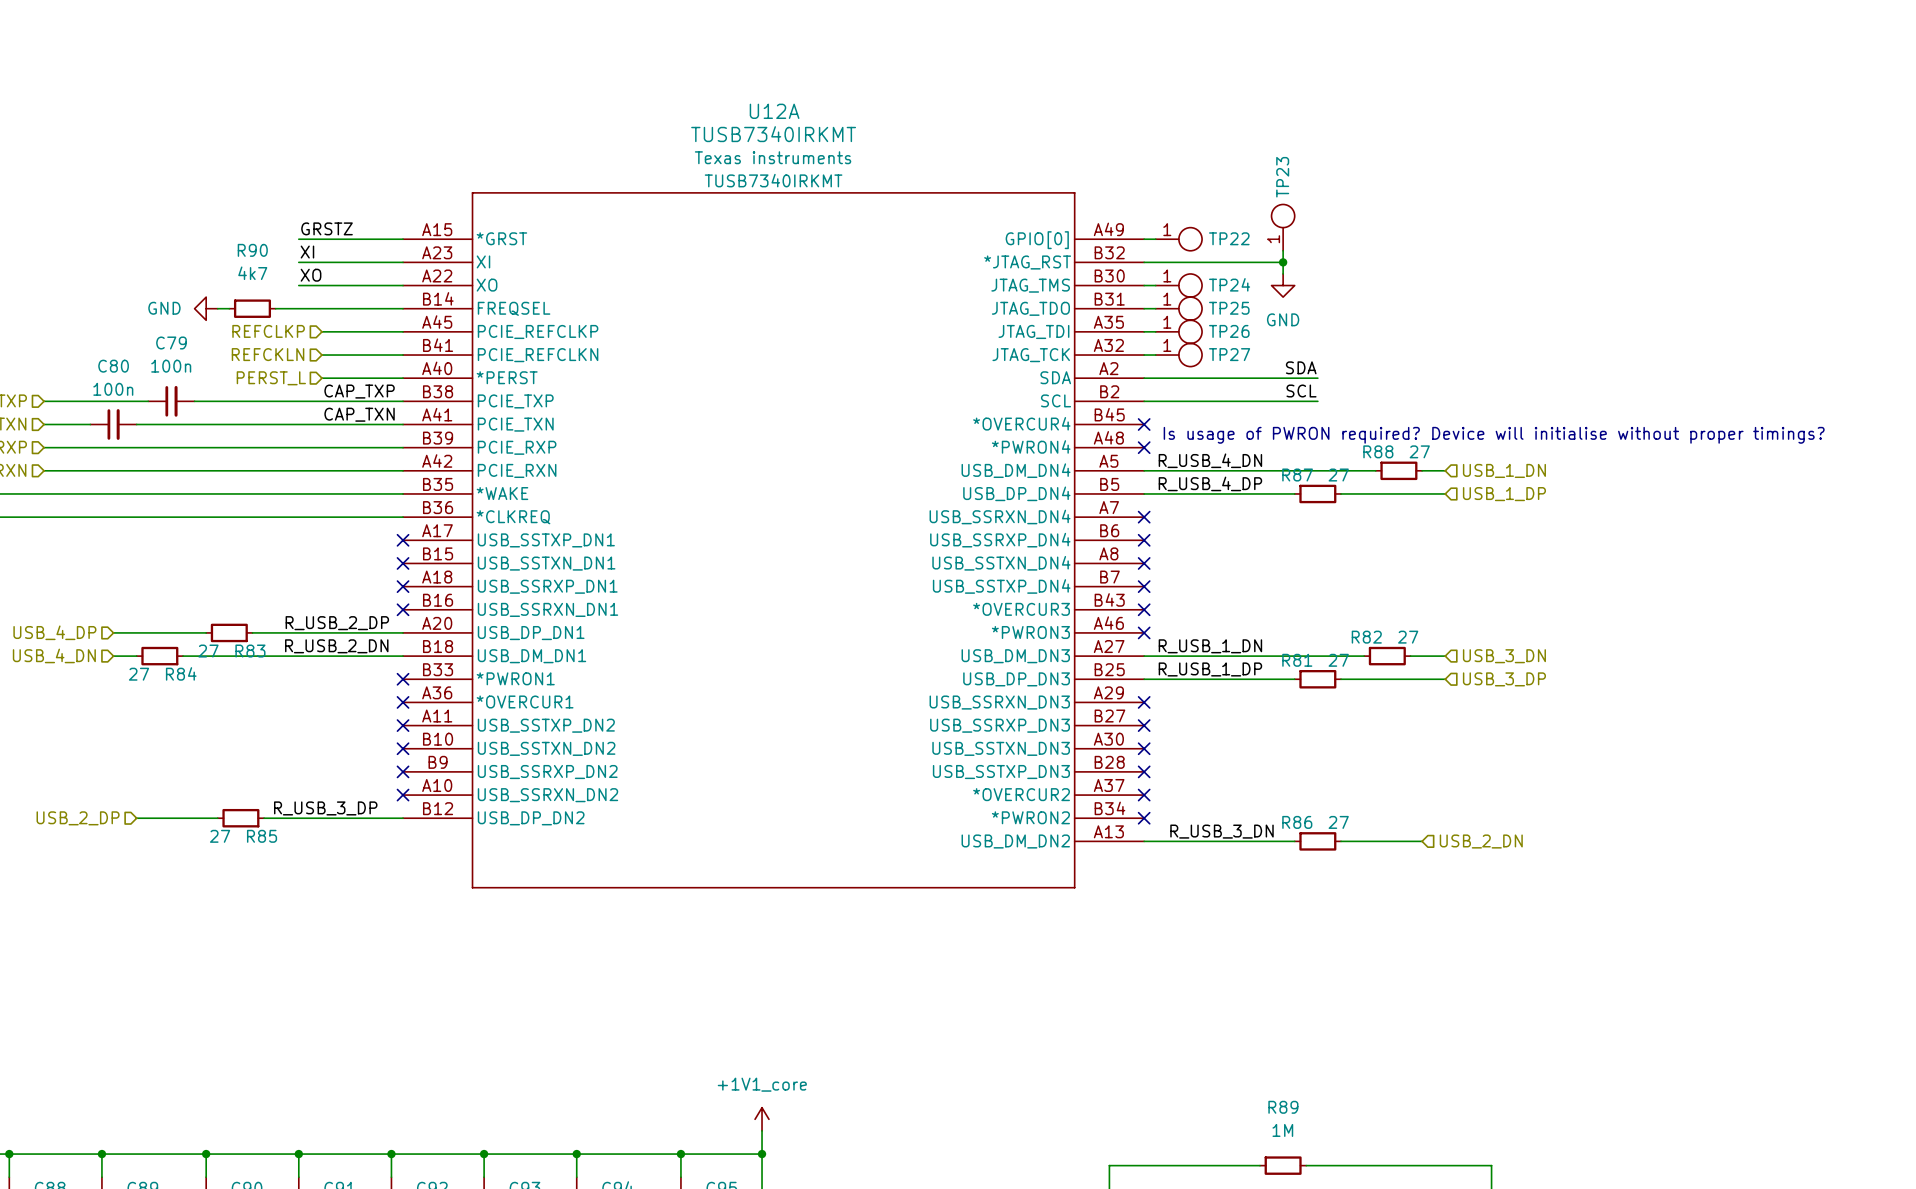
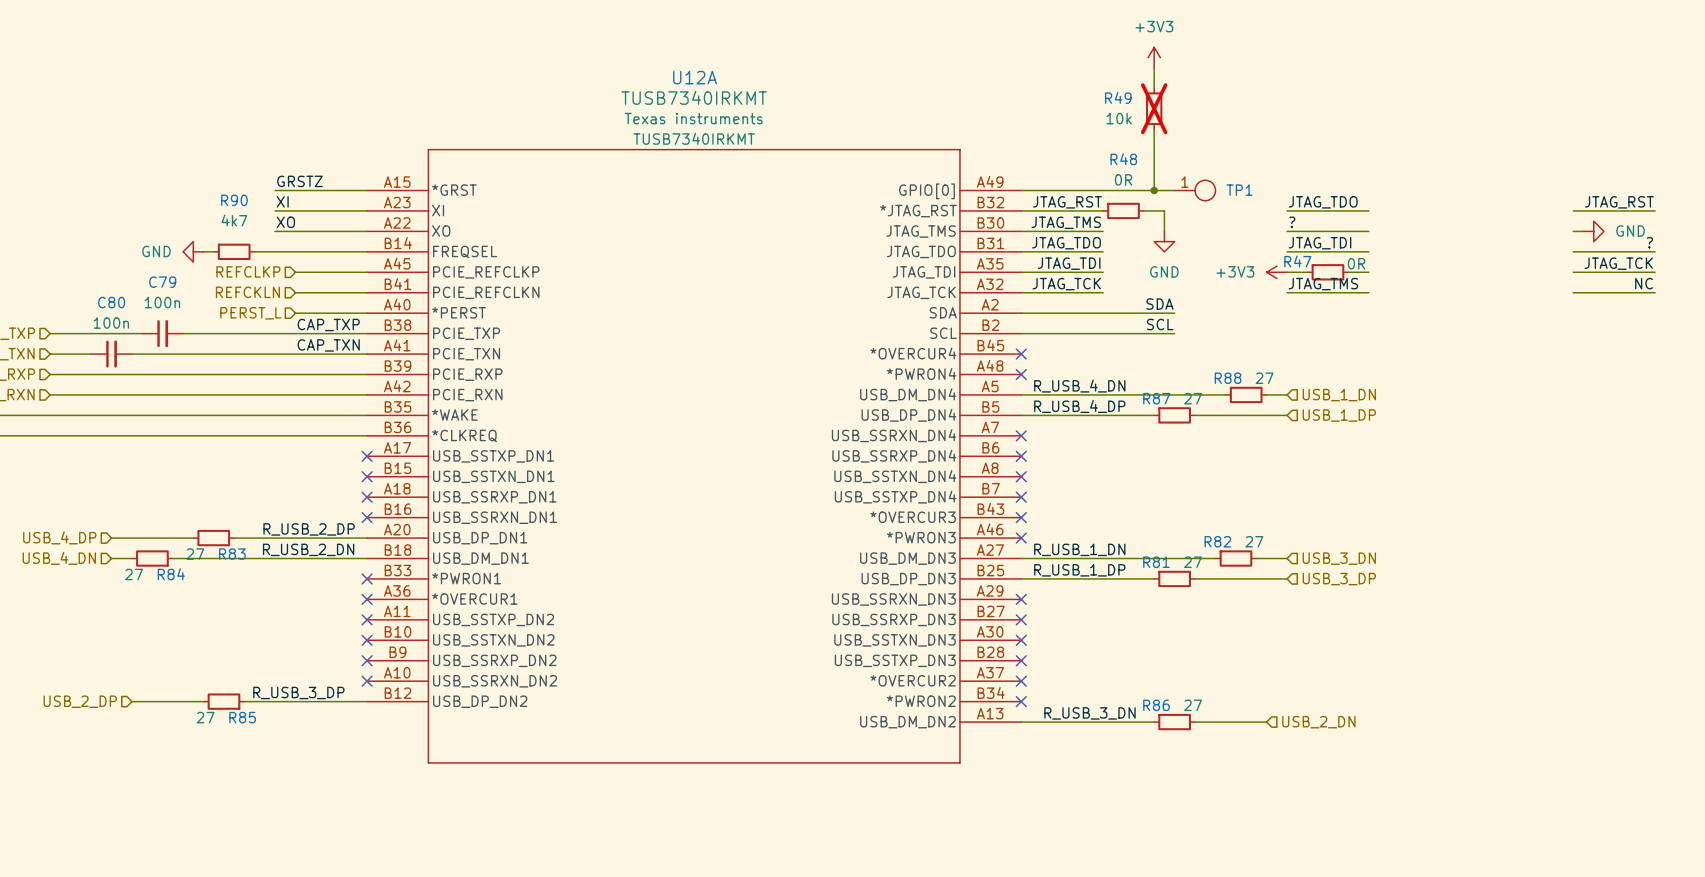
power symbol: none -> +3V3 (1154, 57)
R49: none -> (1154, 108)
wire: none -> (1154, 129) (1154, 190)
TP23: (1283, 227) -> none
wire: none -> (1031, 190) (1174, 190)
TP22: (1178, 239) -> none
TP1: none -> (1195, 190)
wire: (1283, 250) (1283, 273) -> (1154, 67) (1154, 88)
label: none -> JTAG_RST (1067, 202)
label: none -> JTAG_TDO (1323, 202)
label: none -> JTAG_RST (1619, 202)
wire: (1236, 262) (1283, 262) -> (1164, 231) (1164, 210) (1143, 210)
R48: none -> (1123, 210)
junction position: (1283, 262) -> (1154, 190)
wire: none -> (1287, 210) (1368, 210)
wire: none -> (1573, 210) (1655, 210)
label: none -> JTAG_TMS (1066, 222)
label: none -> ? (1292, 222)
wire: none -> (1031, 231) (1103, 231)
TP24: (1178, 285) -> none
power symbol position: GND (1283, 285) -> GND (1164, 241)
wire: none -> (1287, 231) (1368, 231)
wire: none -> (1573, 231) (1583, 231)
power symbol: none -> GND (1593, 231)
label: none -> JTAG_TDO (1066, 243)
label: none -> JTAG_TDI (1320, 243)
label: none -> ? (1649, 242)
wire: none -> (1031, 251) (1103, 251)
TP25: (1178, 308) -> none
wire: none -> (1287, 251) (1368, 251)
wire: none -> (1573, 251) (1655, 251)
label: none -> JTAG_TDI (1069, 263)
label: none -> JTAG_TCK (1618, 263)
wire: none -> (1031, 272) (1103, 272)
TP26: (1178, 331) -> none
power symbol: none -> +3V3 (1276, 272)
wire: none -> (1287, 272) (1307, 272)
R47: none -> (1327, 272)
wire: none -> (1348, 272) (1368, 272)
wire: none -> (1573, 272) (1655, 272)
label: none -> NC (1644, 283)
label: none -> JTAG_TCK (1066, 284)
label: none -> JTAG_TMS (1323, 284)
wire: none -> (1031, 292) (1103, 292)
TP27: (1178, 355) -> none
wire: none -> (1287, 292) (1368, 292)
wire: none -> (1573, 292) (1655, 292)
text: Is usage of PWRON required? Device will initialise without proper timings? (1494, 435) -> none

